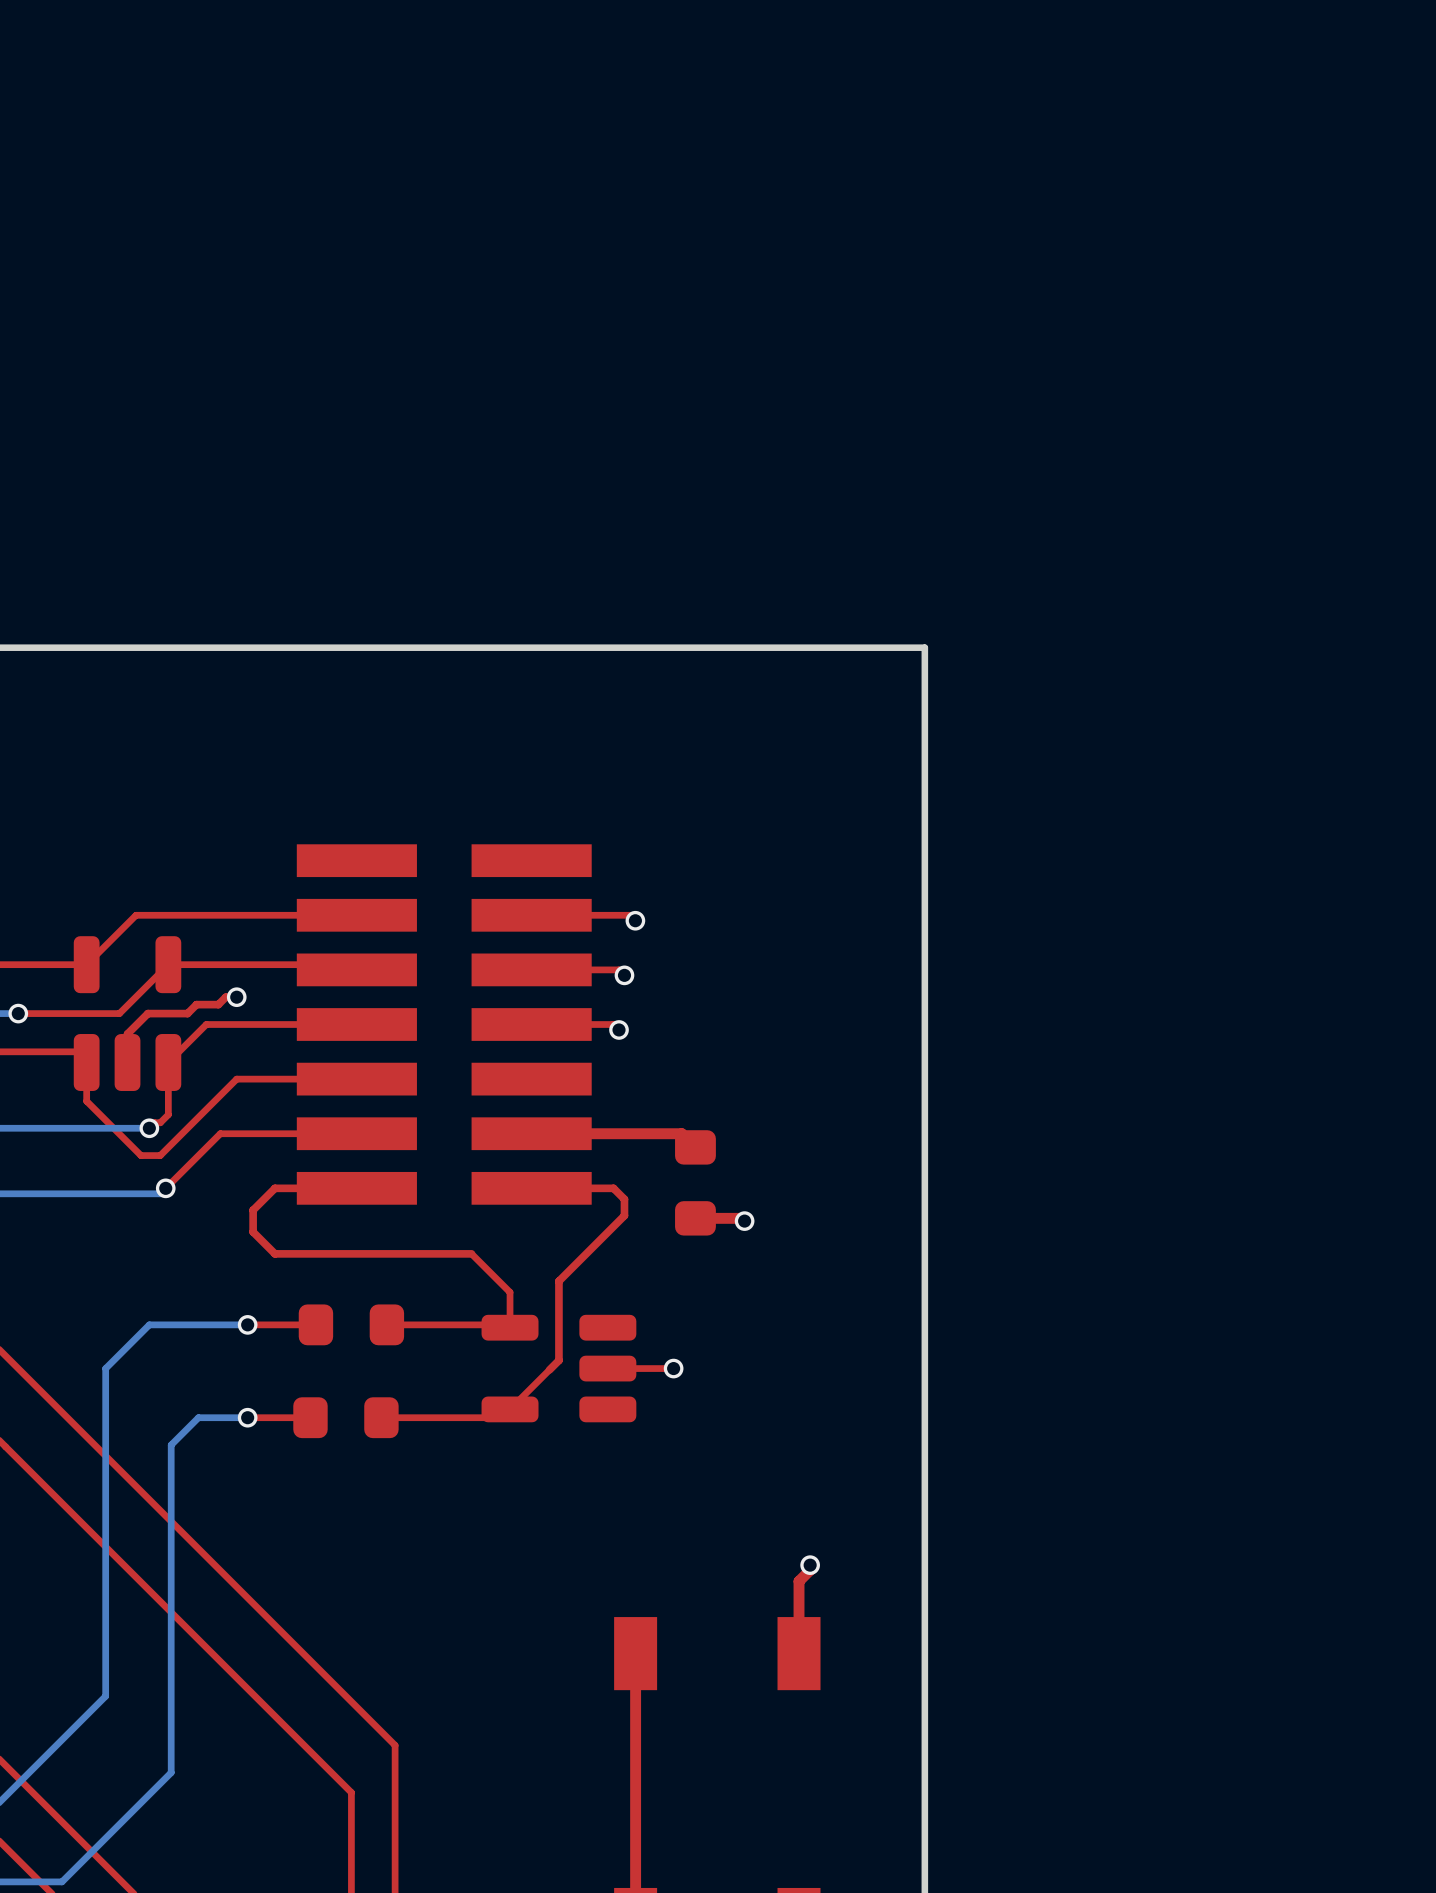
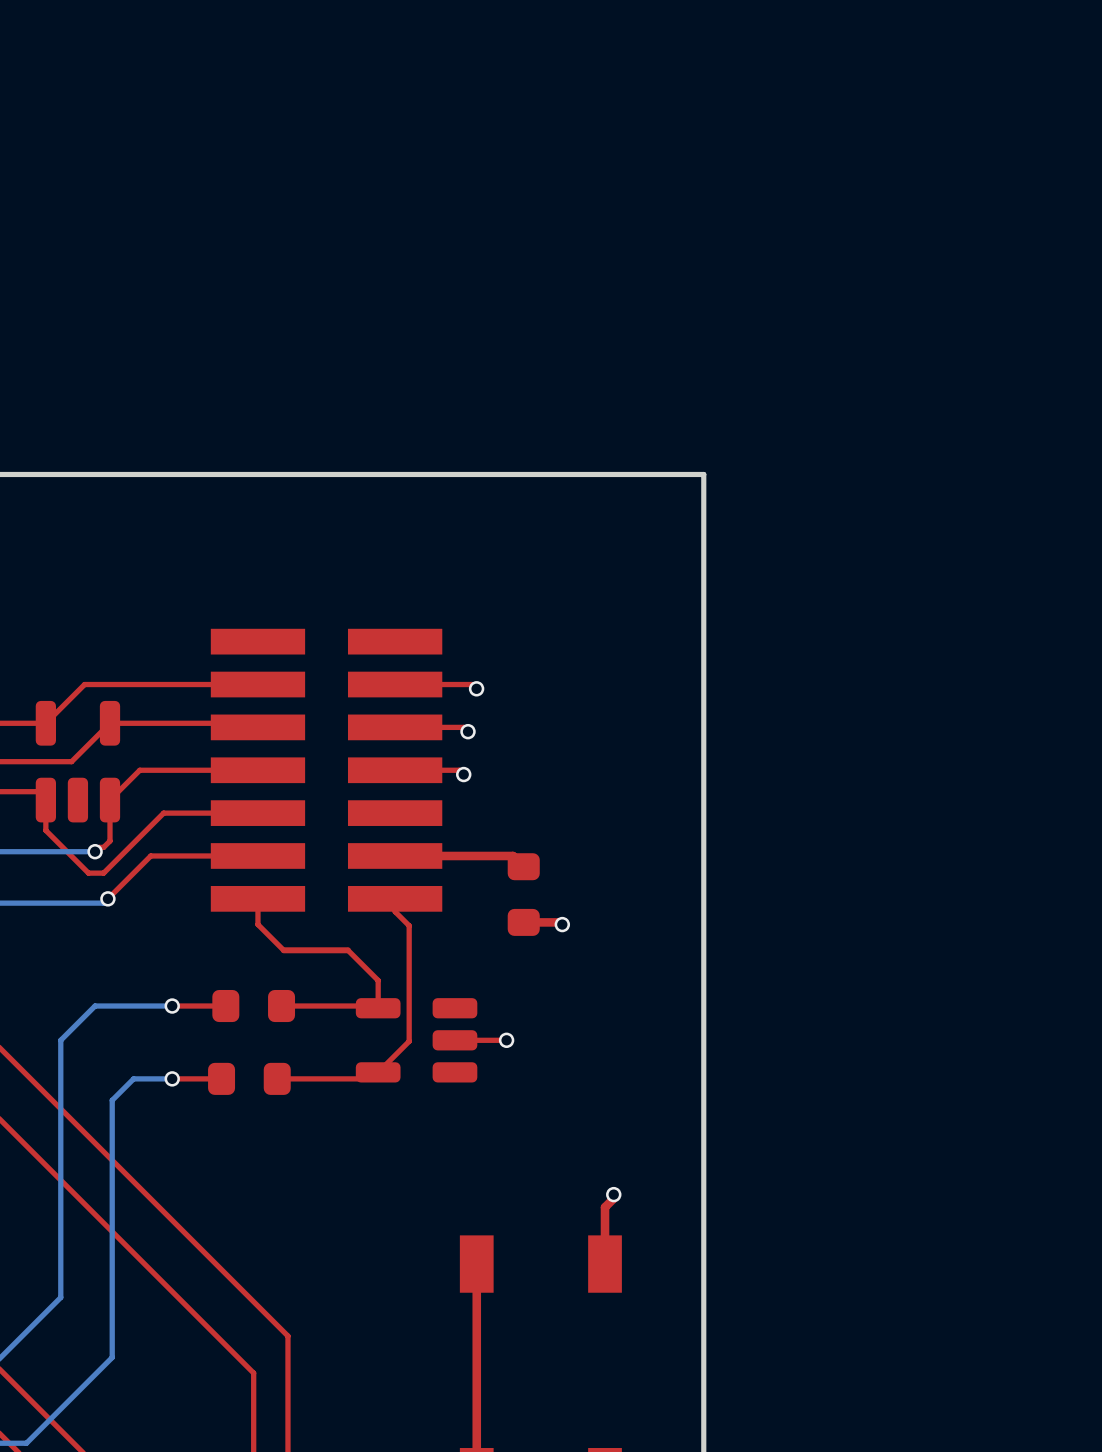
top track: (236, 997) (225, 997) (218, 1004) (196, 1004) (187, 1013) (147, 1013) (127, 1034) (127, 1062) -> none
via: (236, 997) -> none
top track: (356, 1188) (274, 1188) (253, 1210) (253, 1232) (274, 1253) (389, 1253) -> (257, 898) (257, 924) (283, 950)
top track: (531, 1188) (613, 1188) (624, 1199) (624, 1215) (558, 1281) (558, 1360) (549, 1369) -> (395, 898) (395, 911) (409, 925) (409, 1041)

